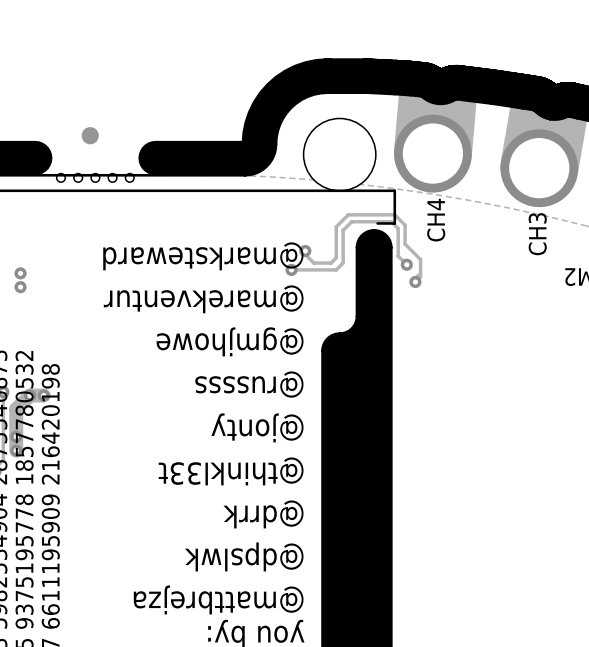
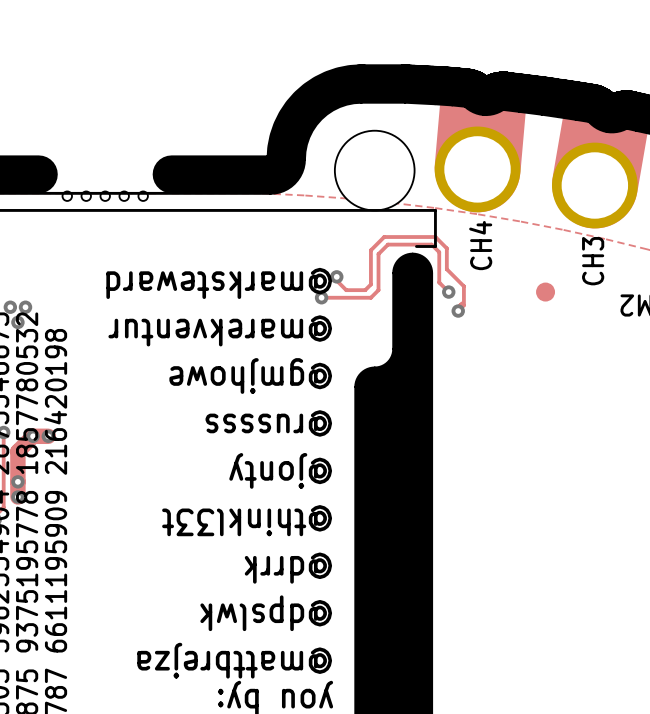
part position: (90, 135) -> (545, 292)
via: (20, 273) -> none
via: none -> (10, 307)
via: none -> (25, 307)
via: (20, 287) -> none
via: none -> (17, 322)

